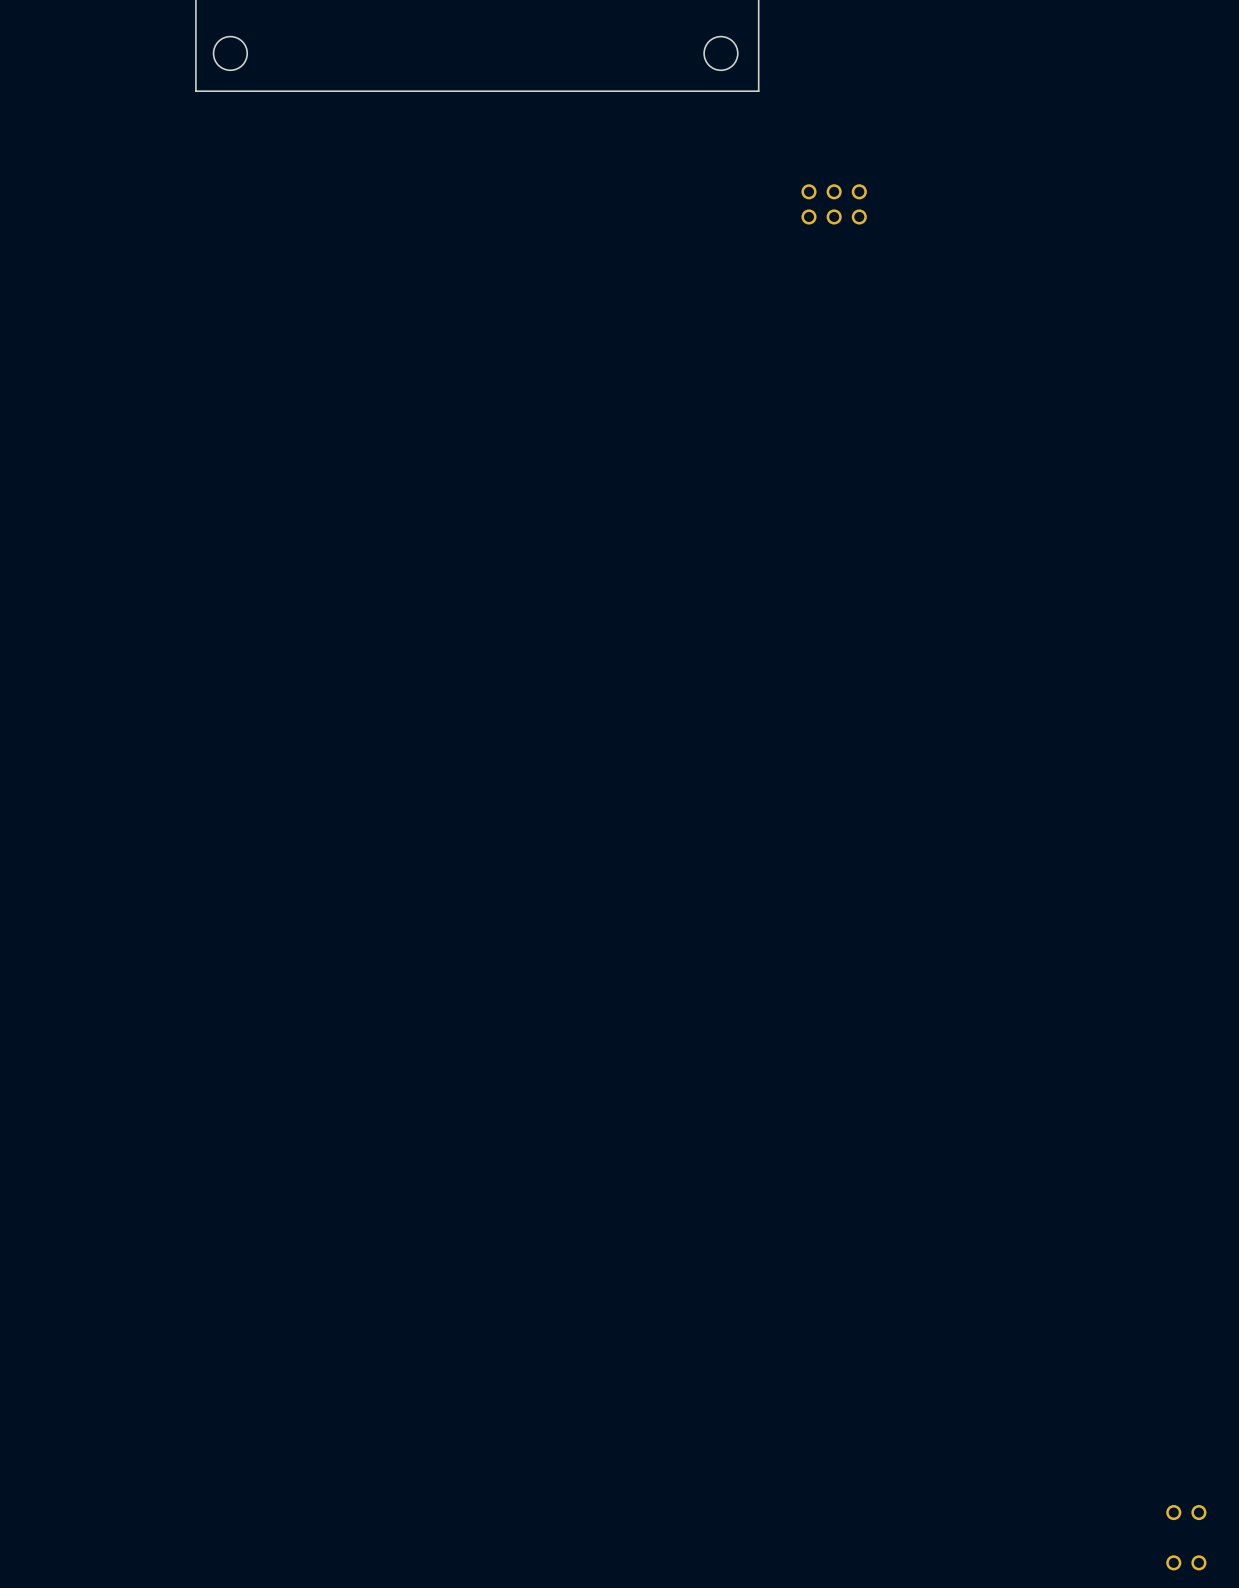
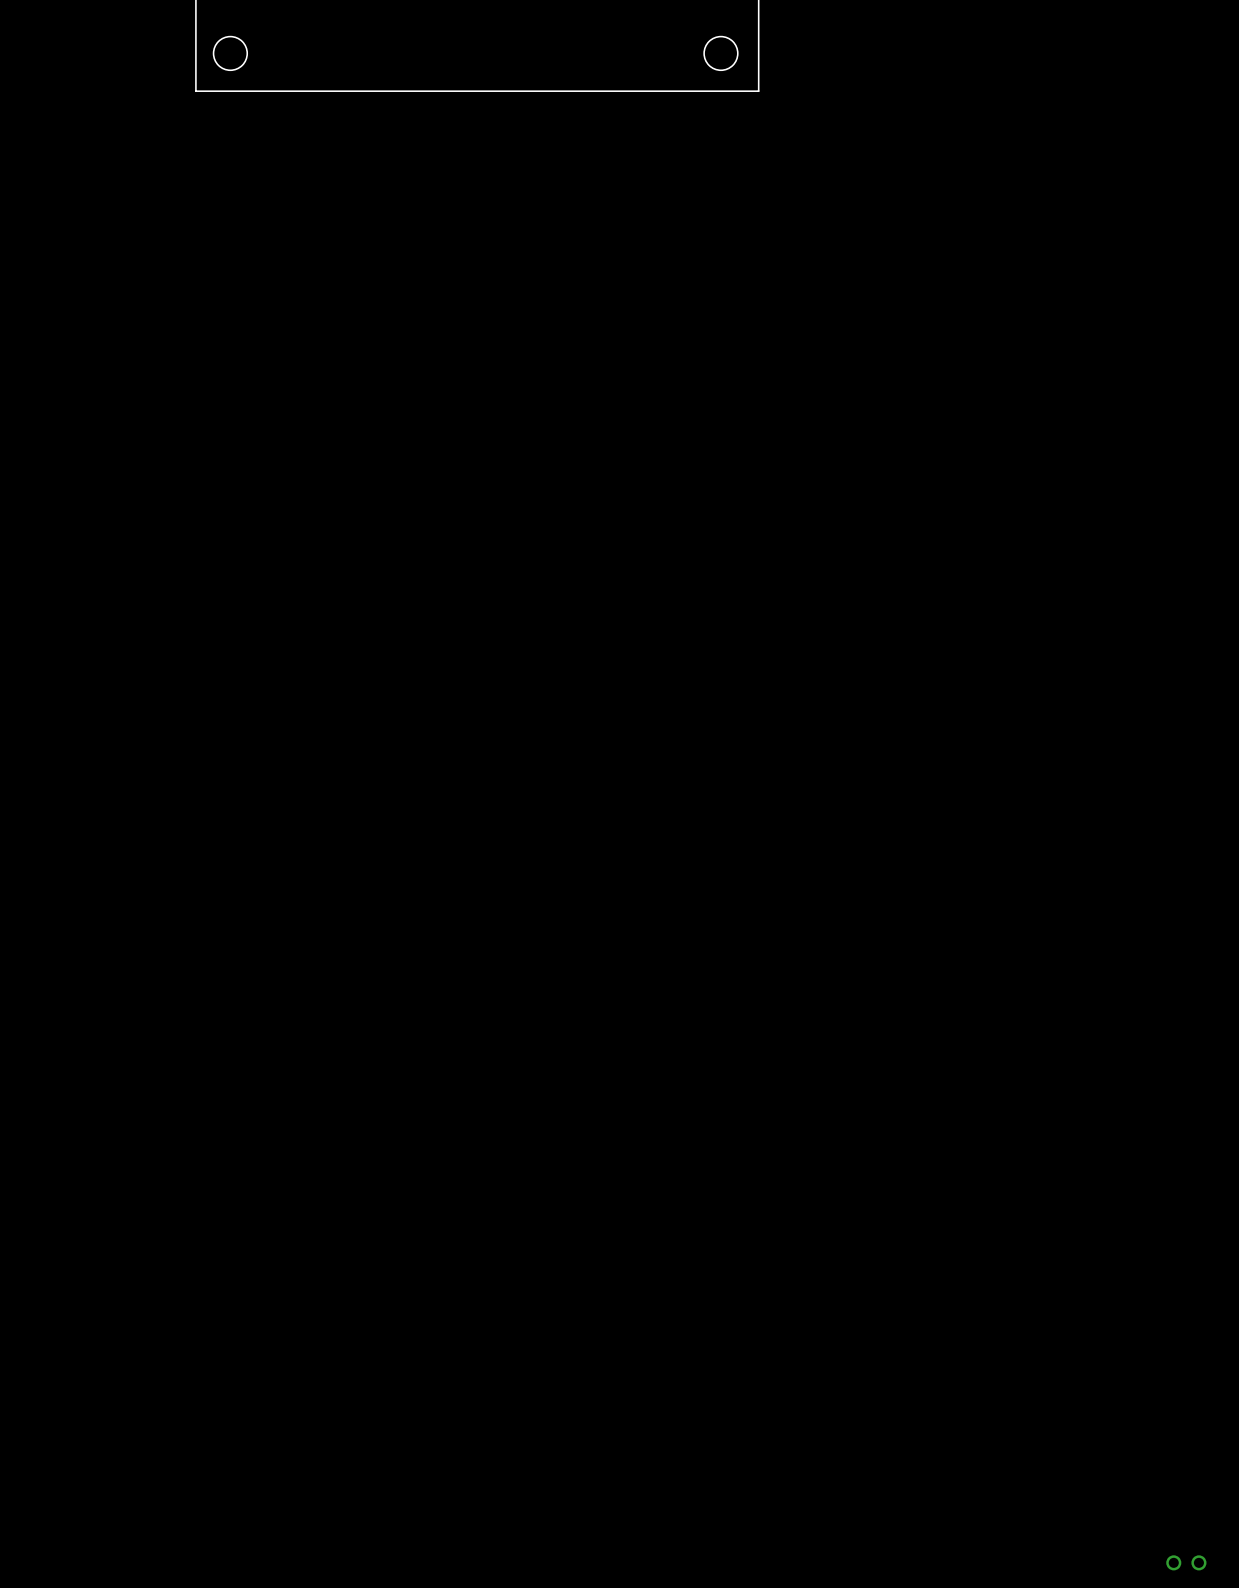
part: (834, 204) -> none
part: (1186, 1512) -> none

